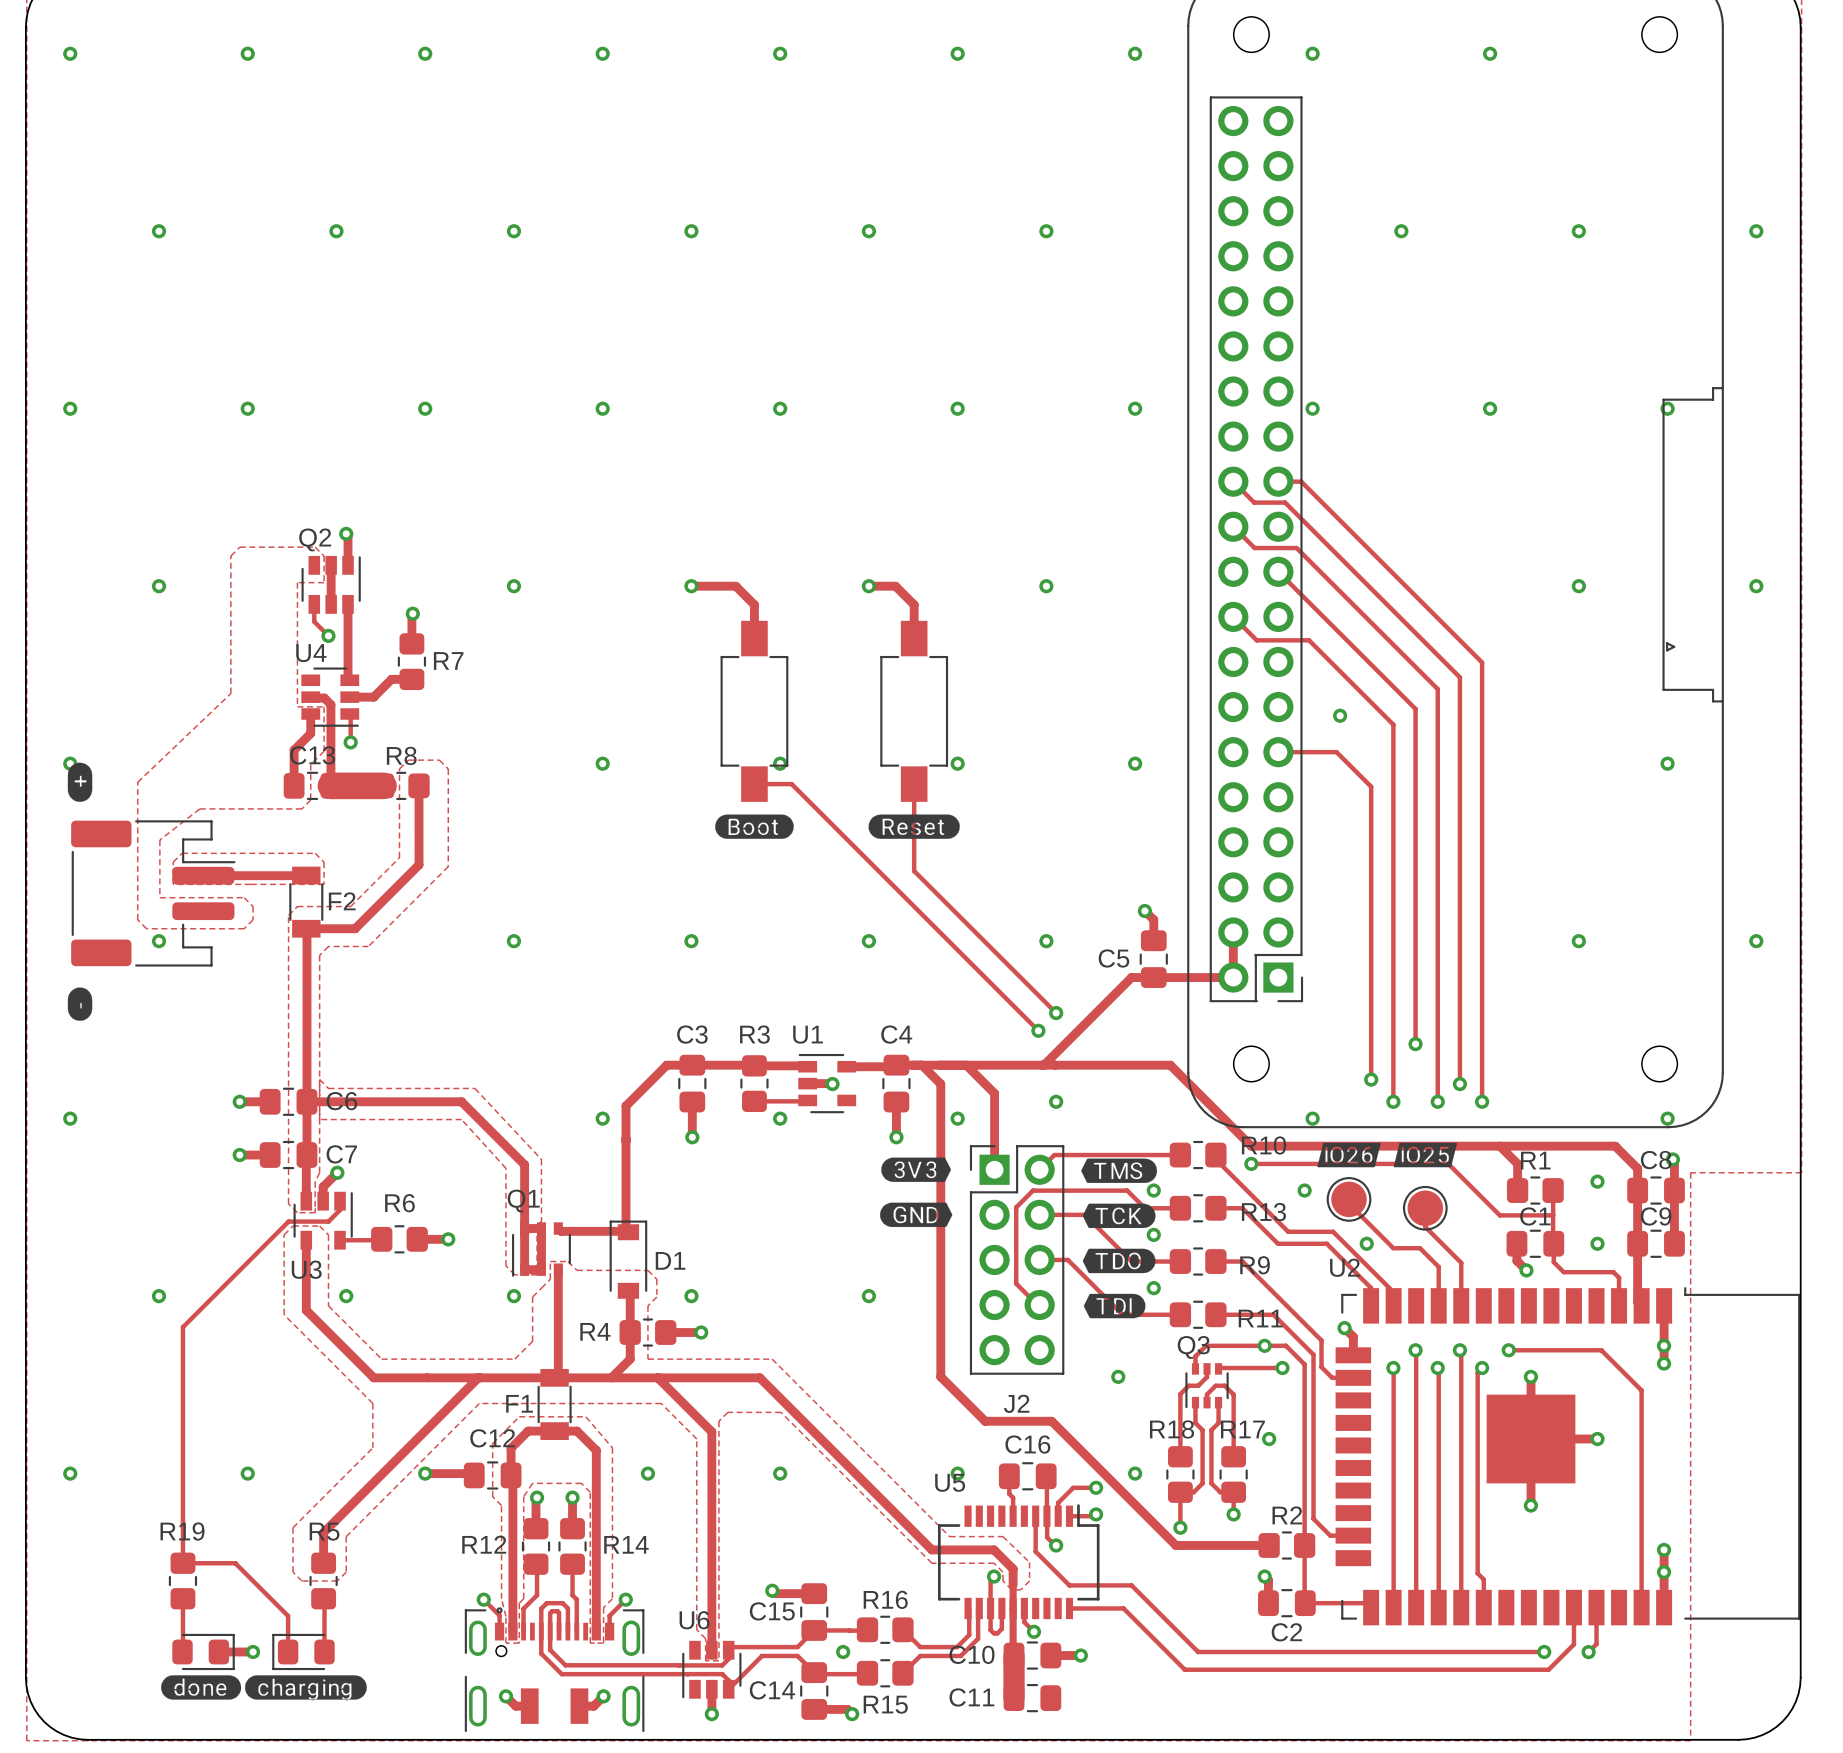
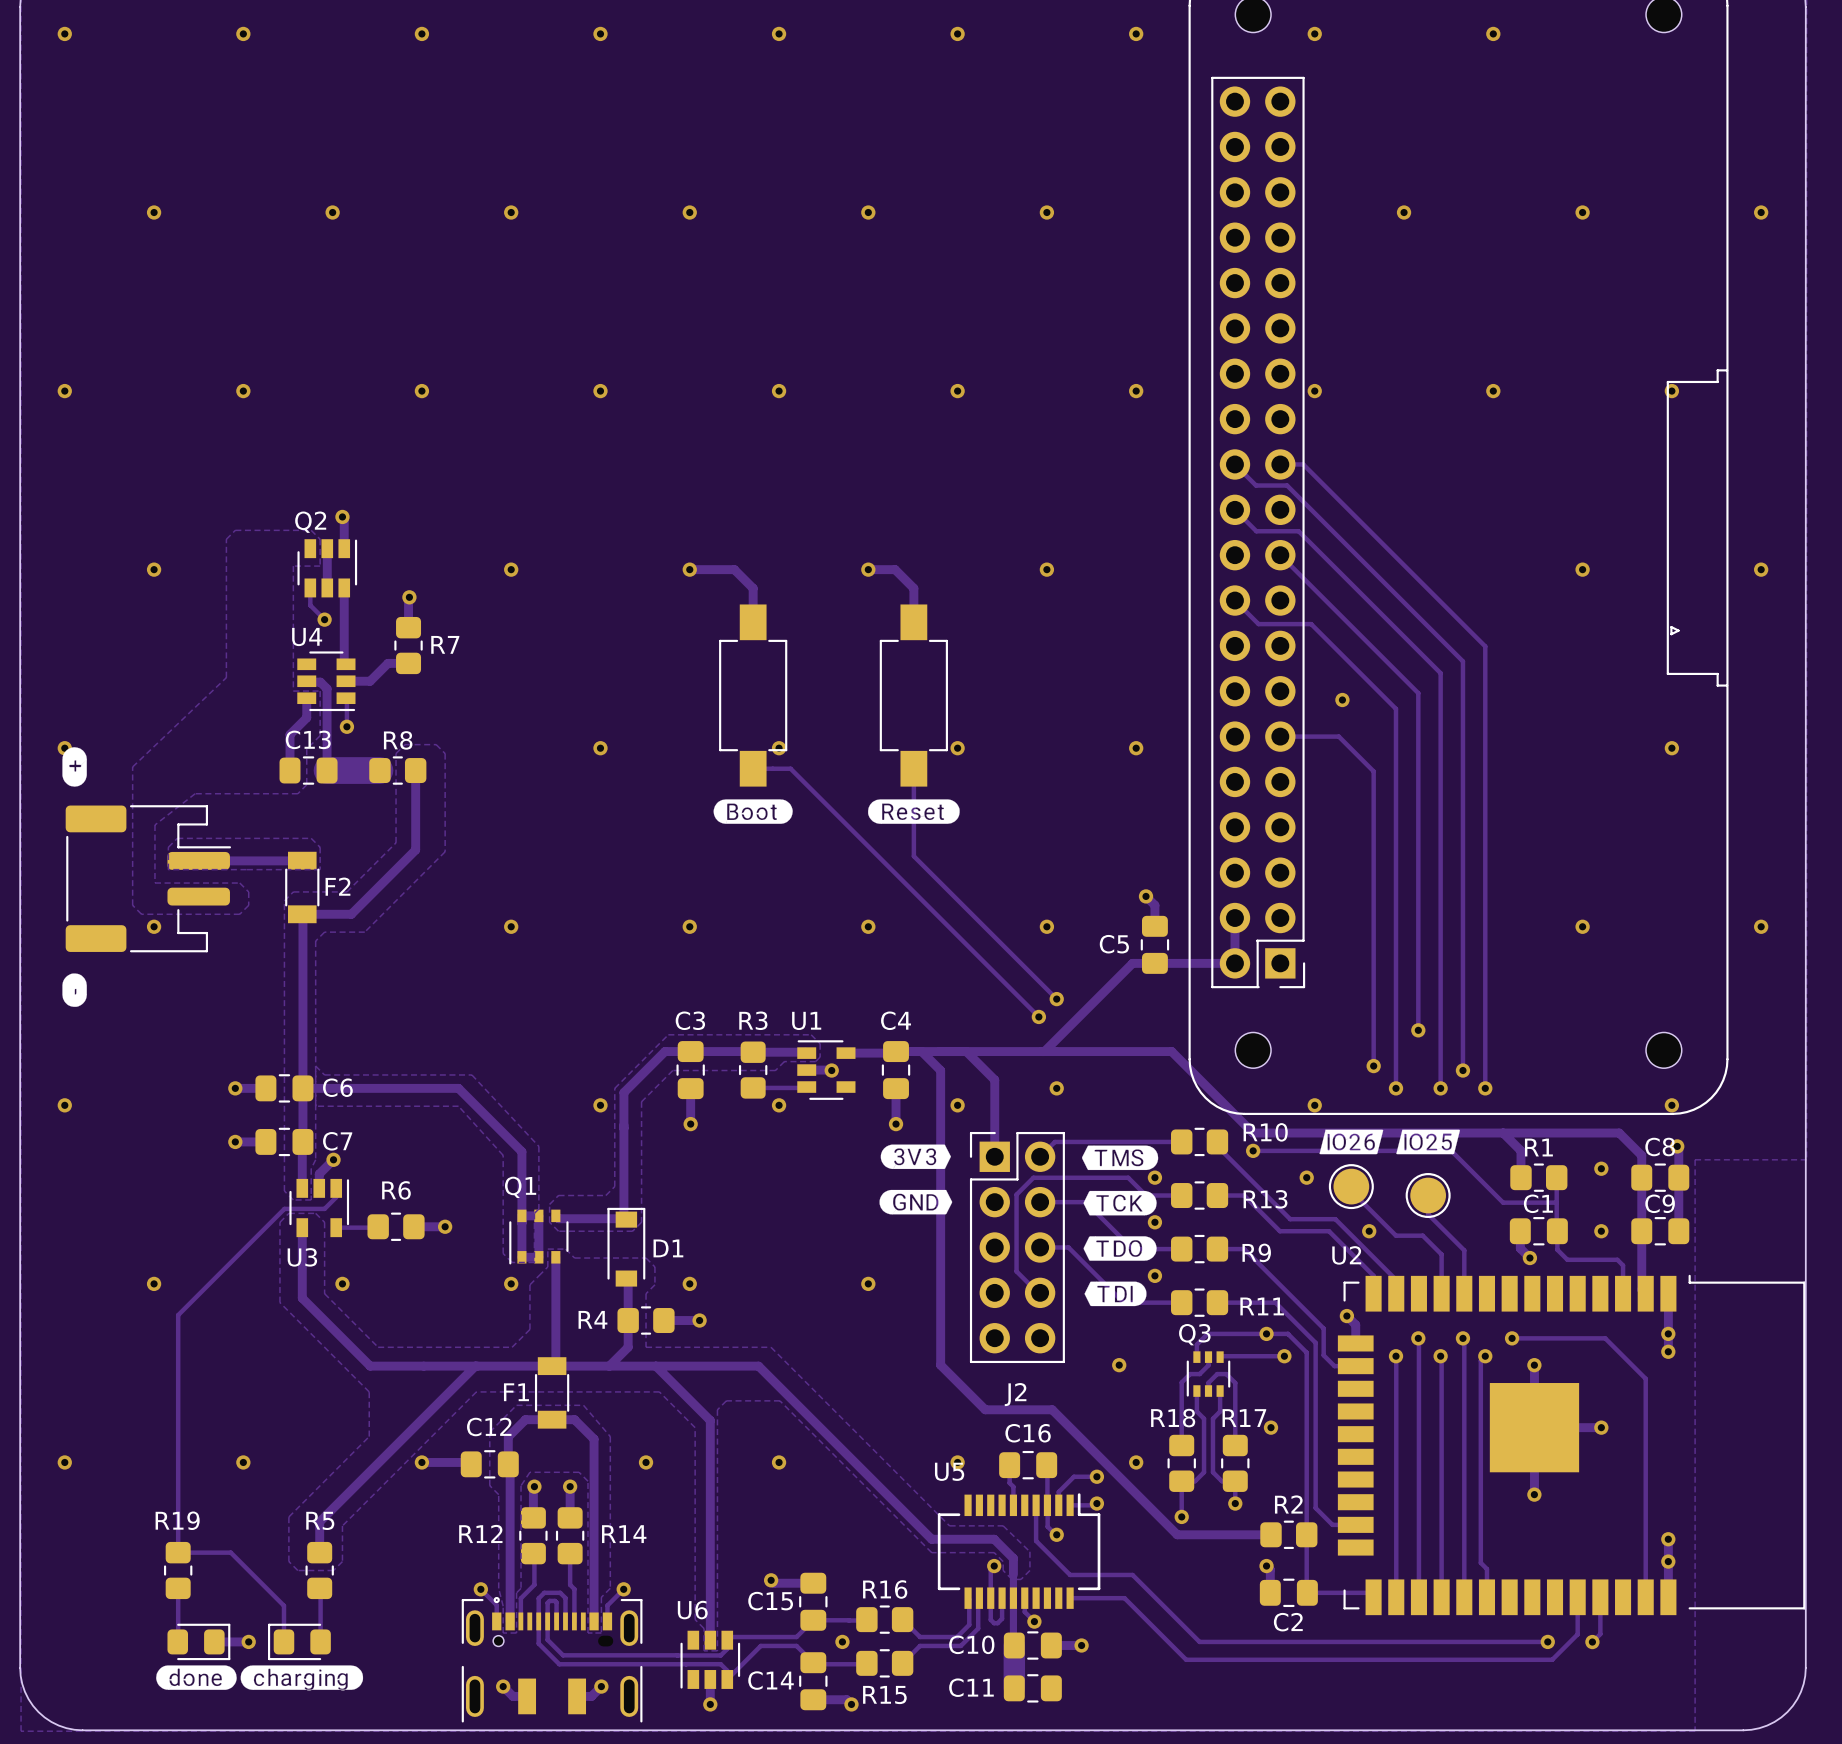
zone outline: none -> (668, 1034) (614, 1088) (614, 1186) (605, 1195) (558, 1195) (549, 1204) (549, 1222) (558, 1231) (632, 1231) (641, 1222) (641, 1101) (672, 1070) (775, 1070) (784, 1061) (815, 1061) (820, 1057) (820, 1043) (811, 1034) (668, 1034)

